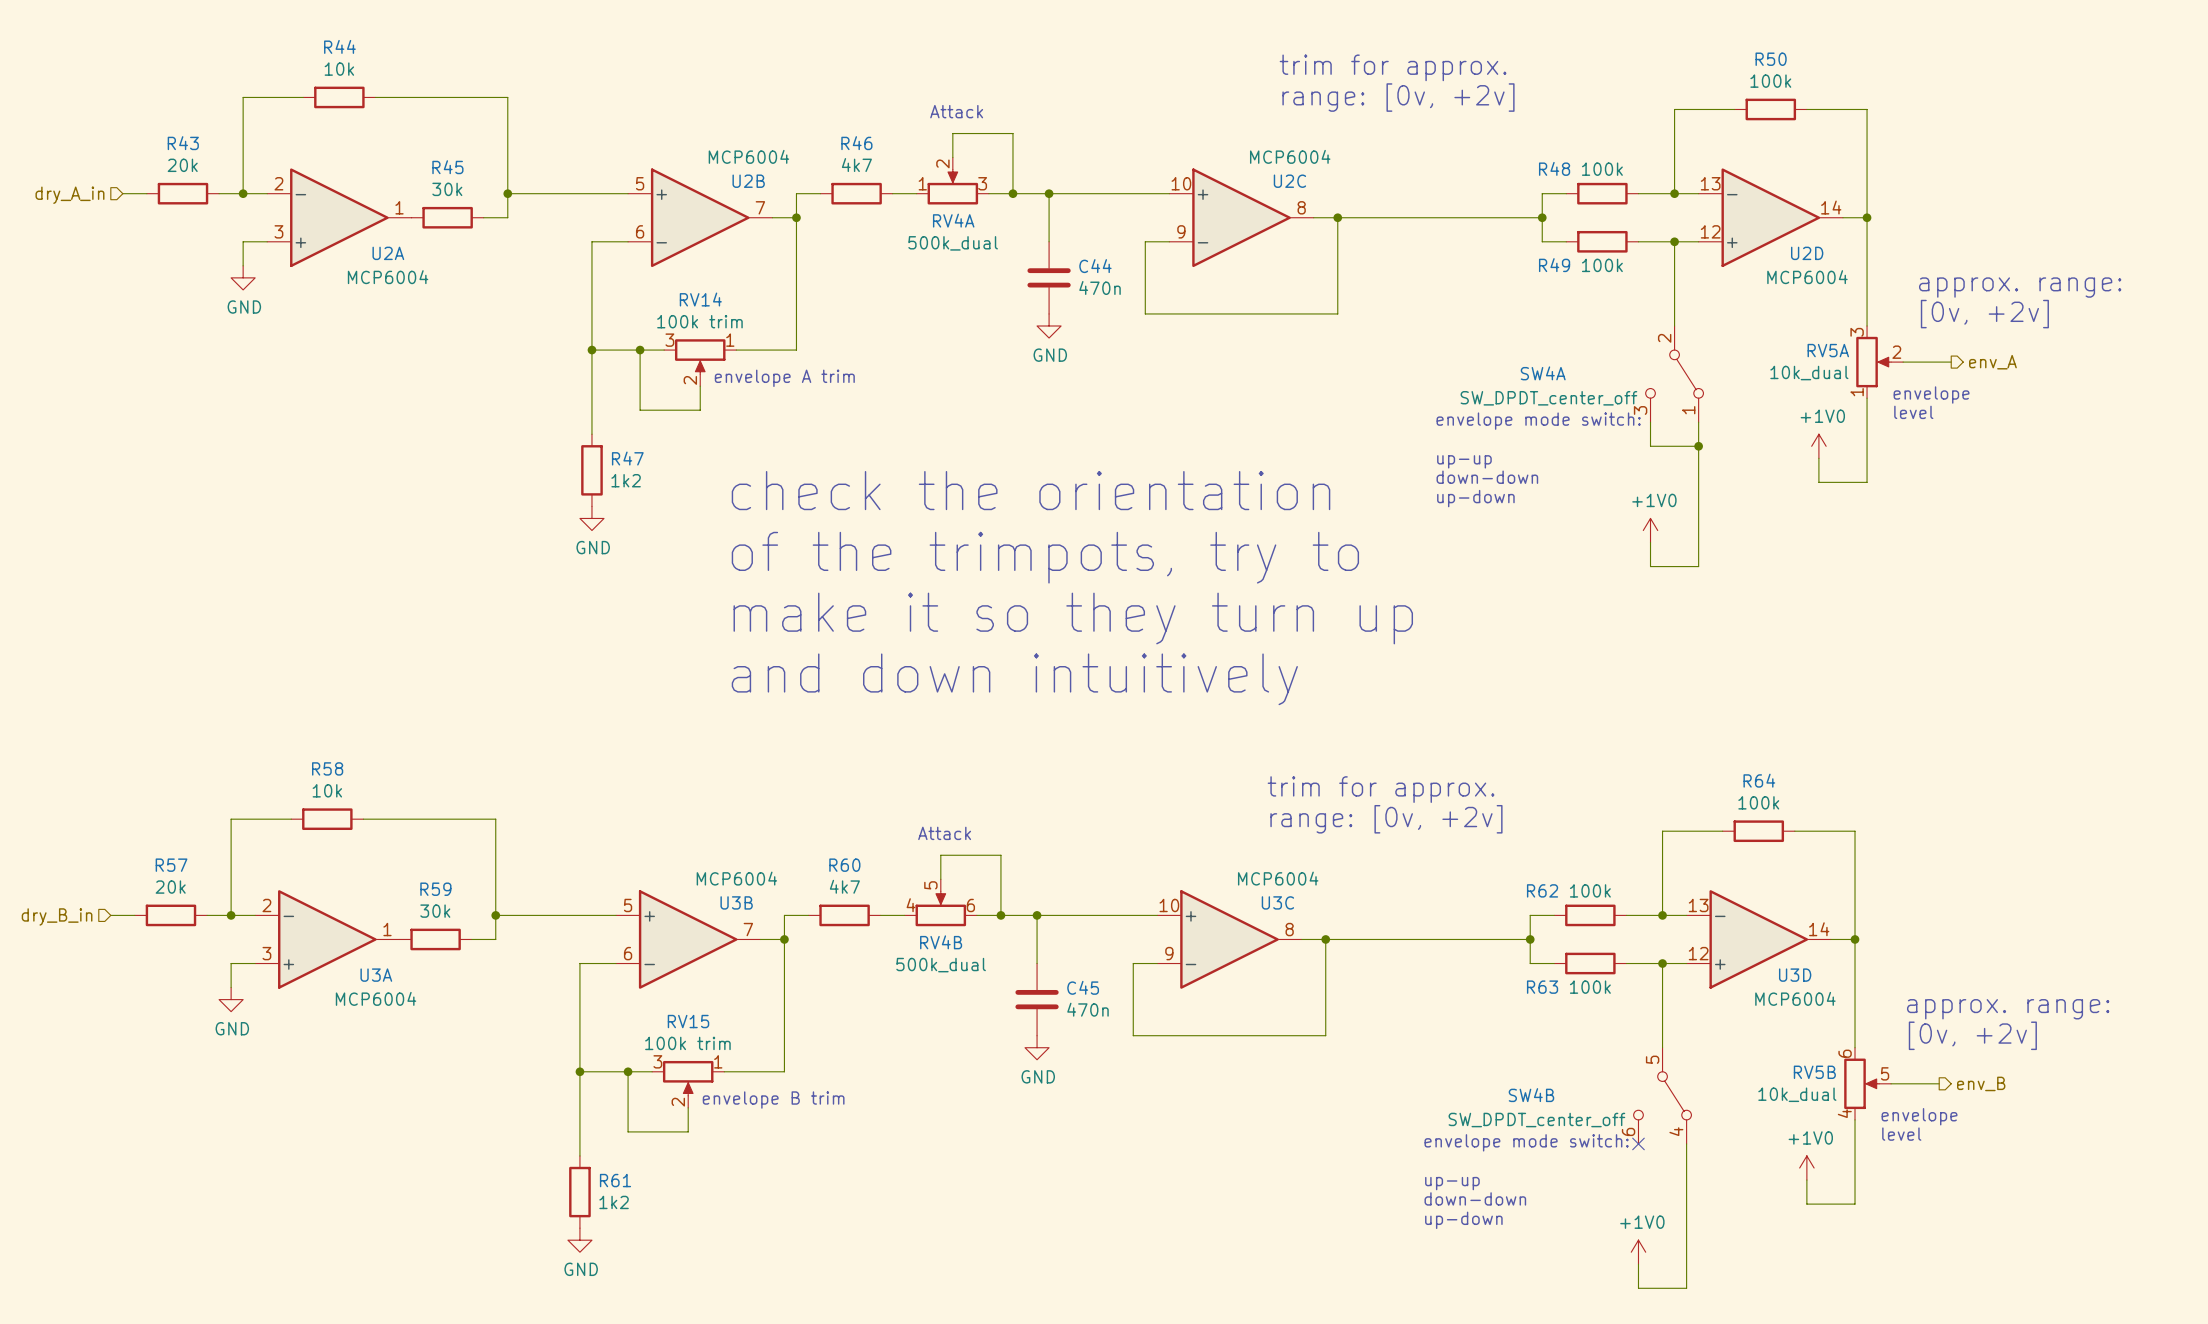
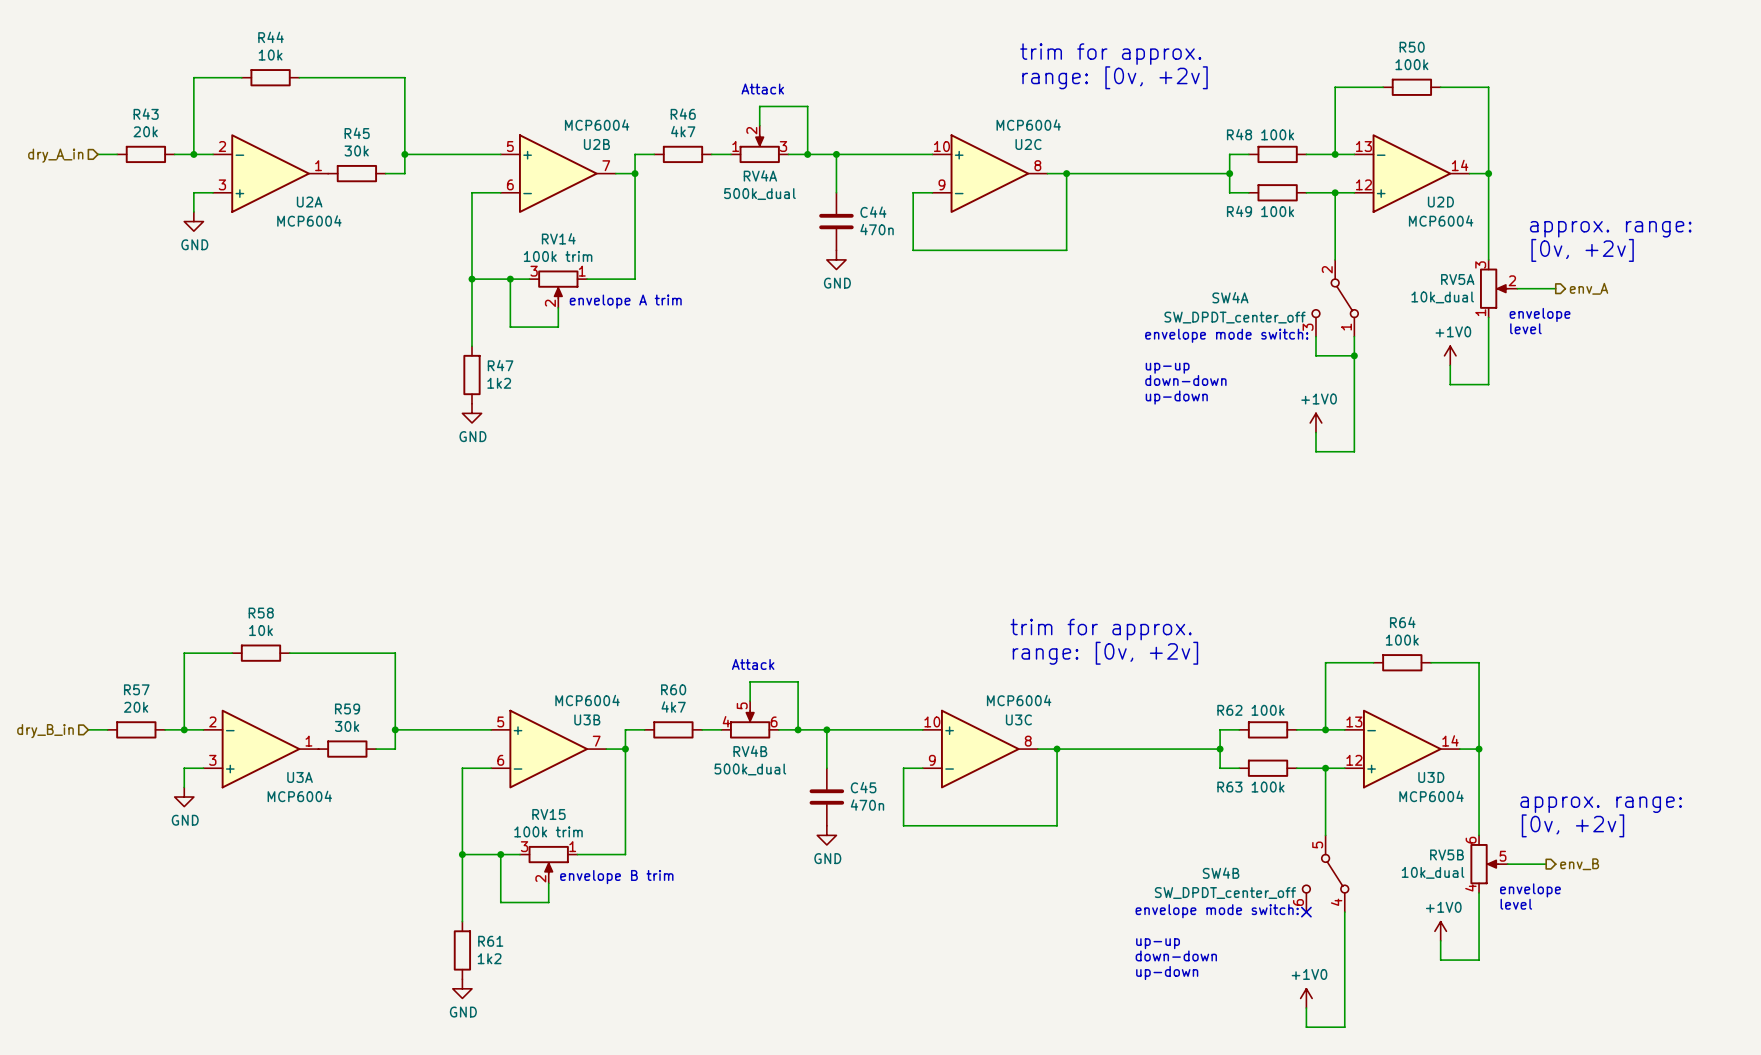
text: check the orientation (1031, 490) -> none
text: of the trimpots, try to (1045, 557) -> none
text: make it so they turn up (1073, 618) -> none
text: and down intuitively (1014, 679) -> none

